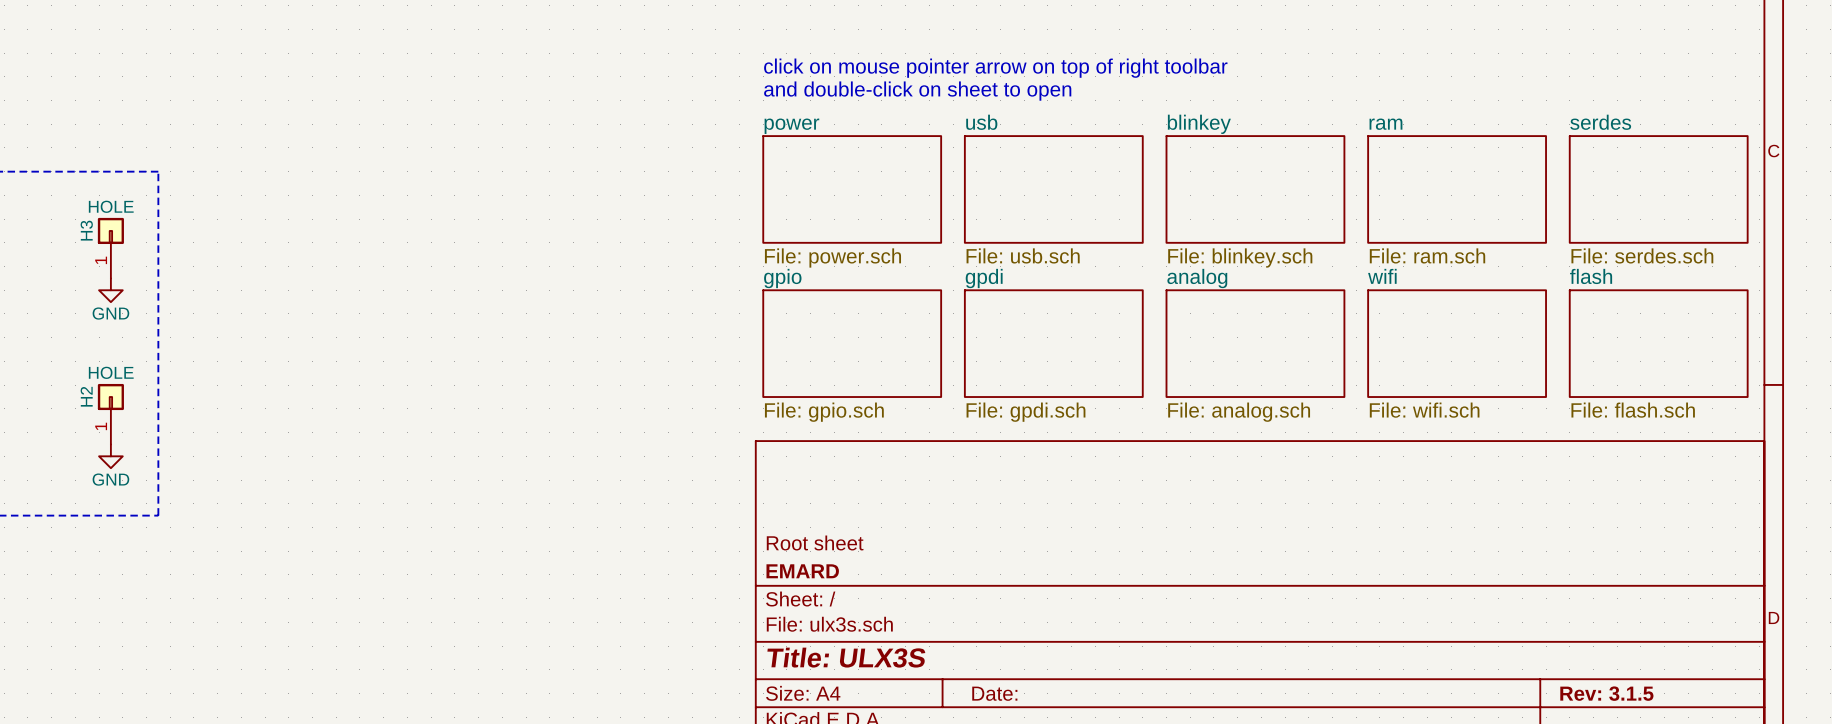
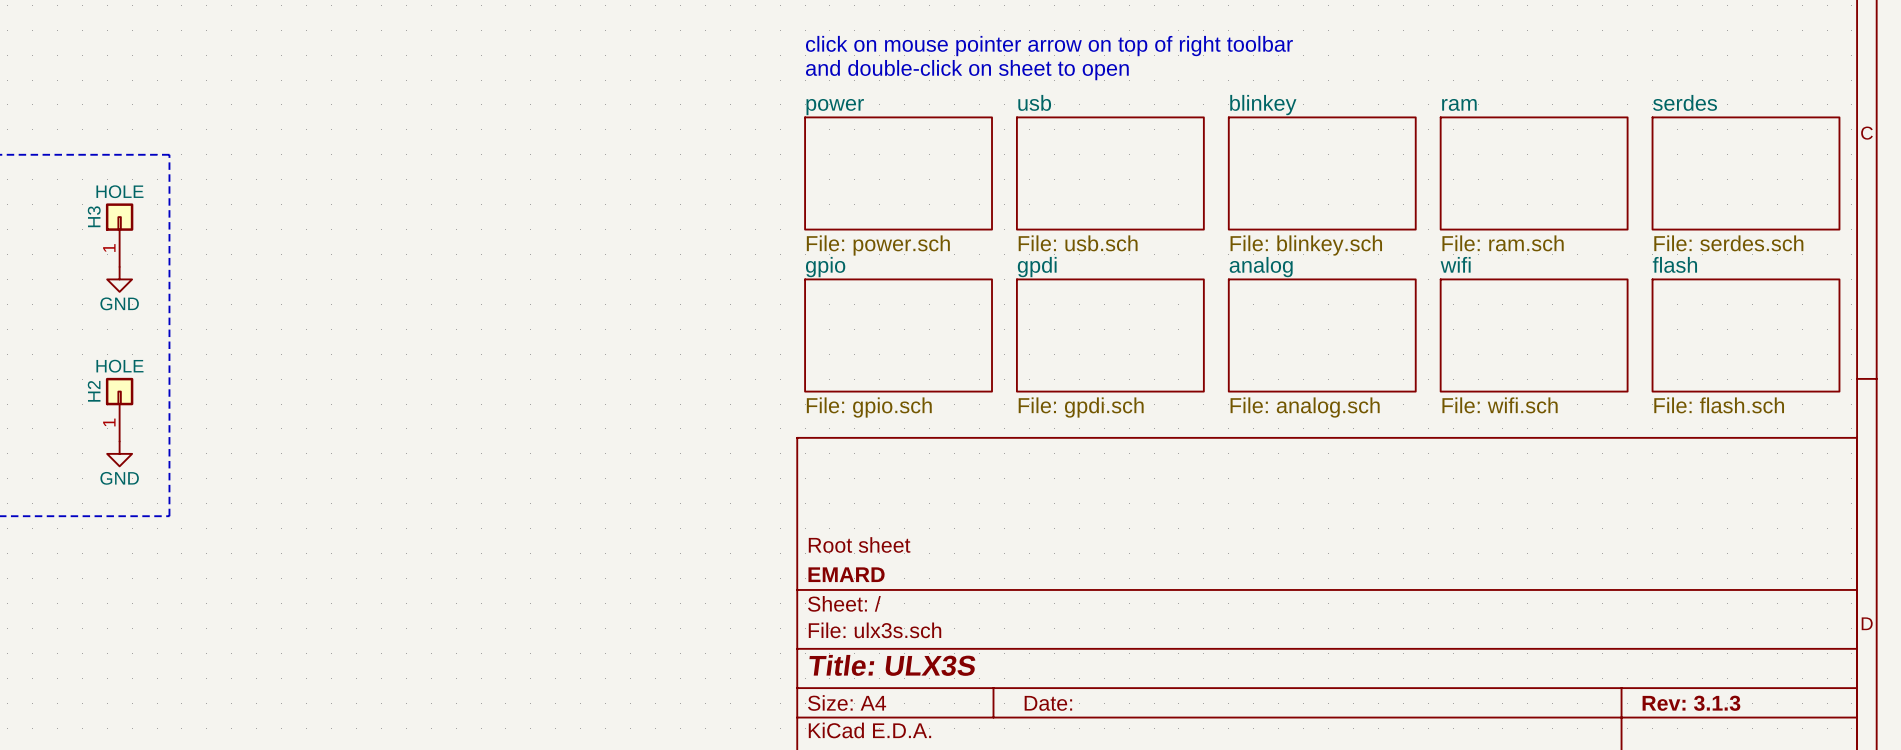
title block: Rev: 3.1.5 (1606, 693) -> Rev: 3.1.3 (1691, 703)

